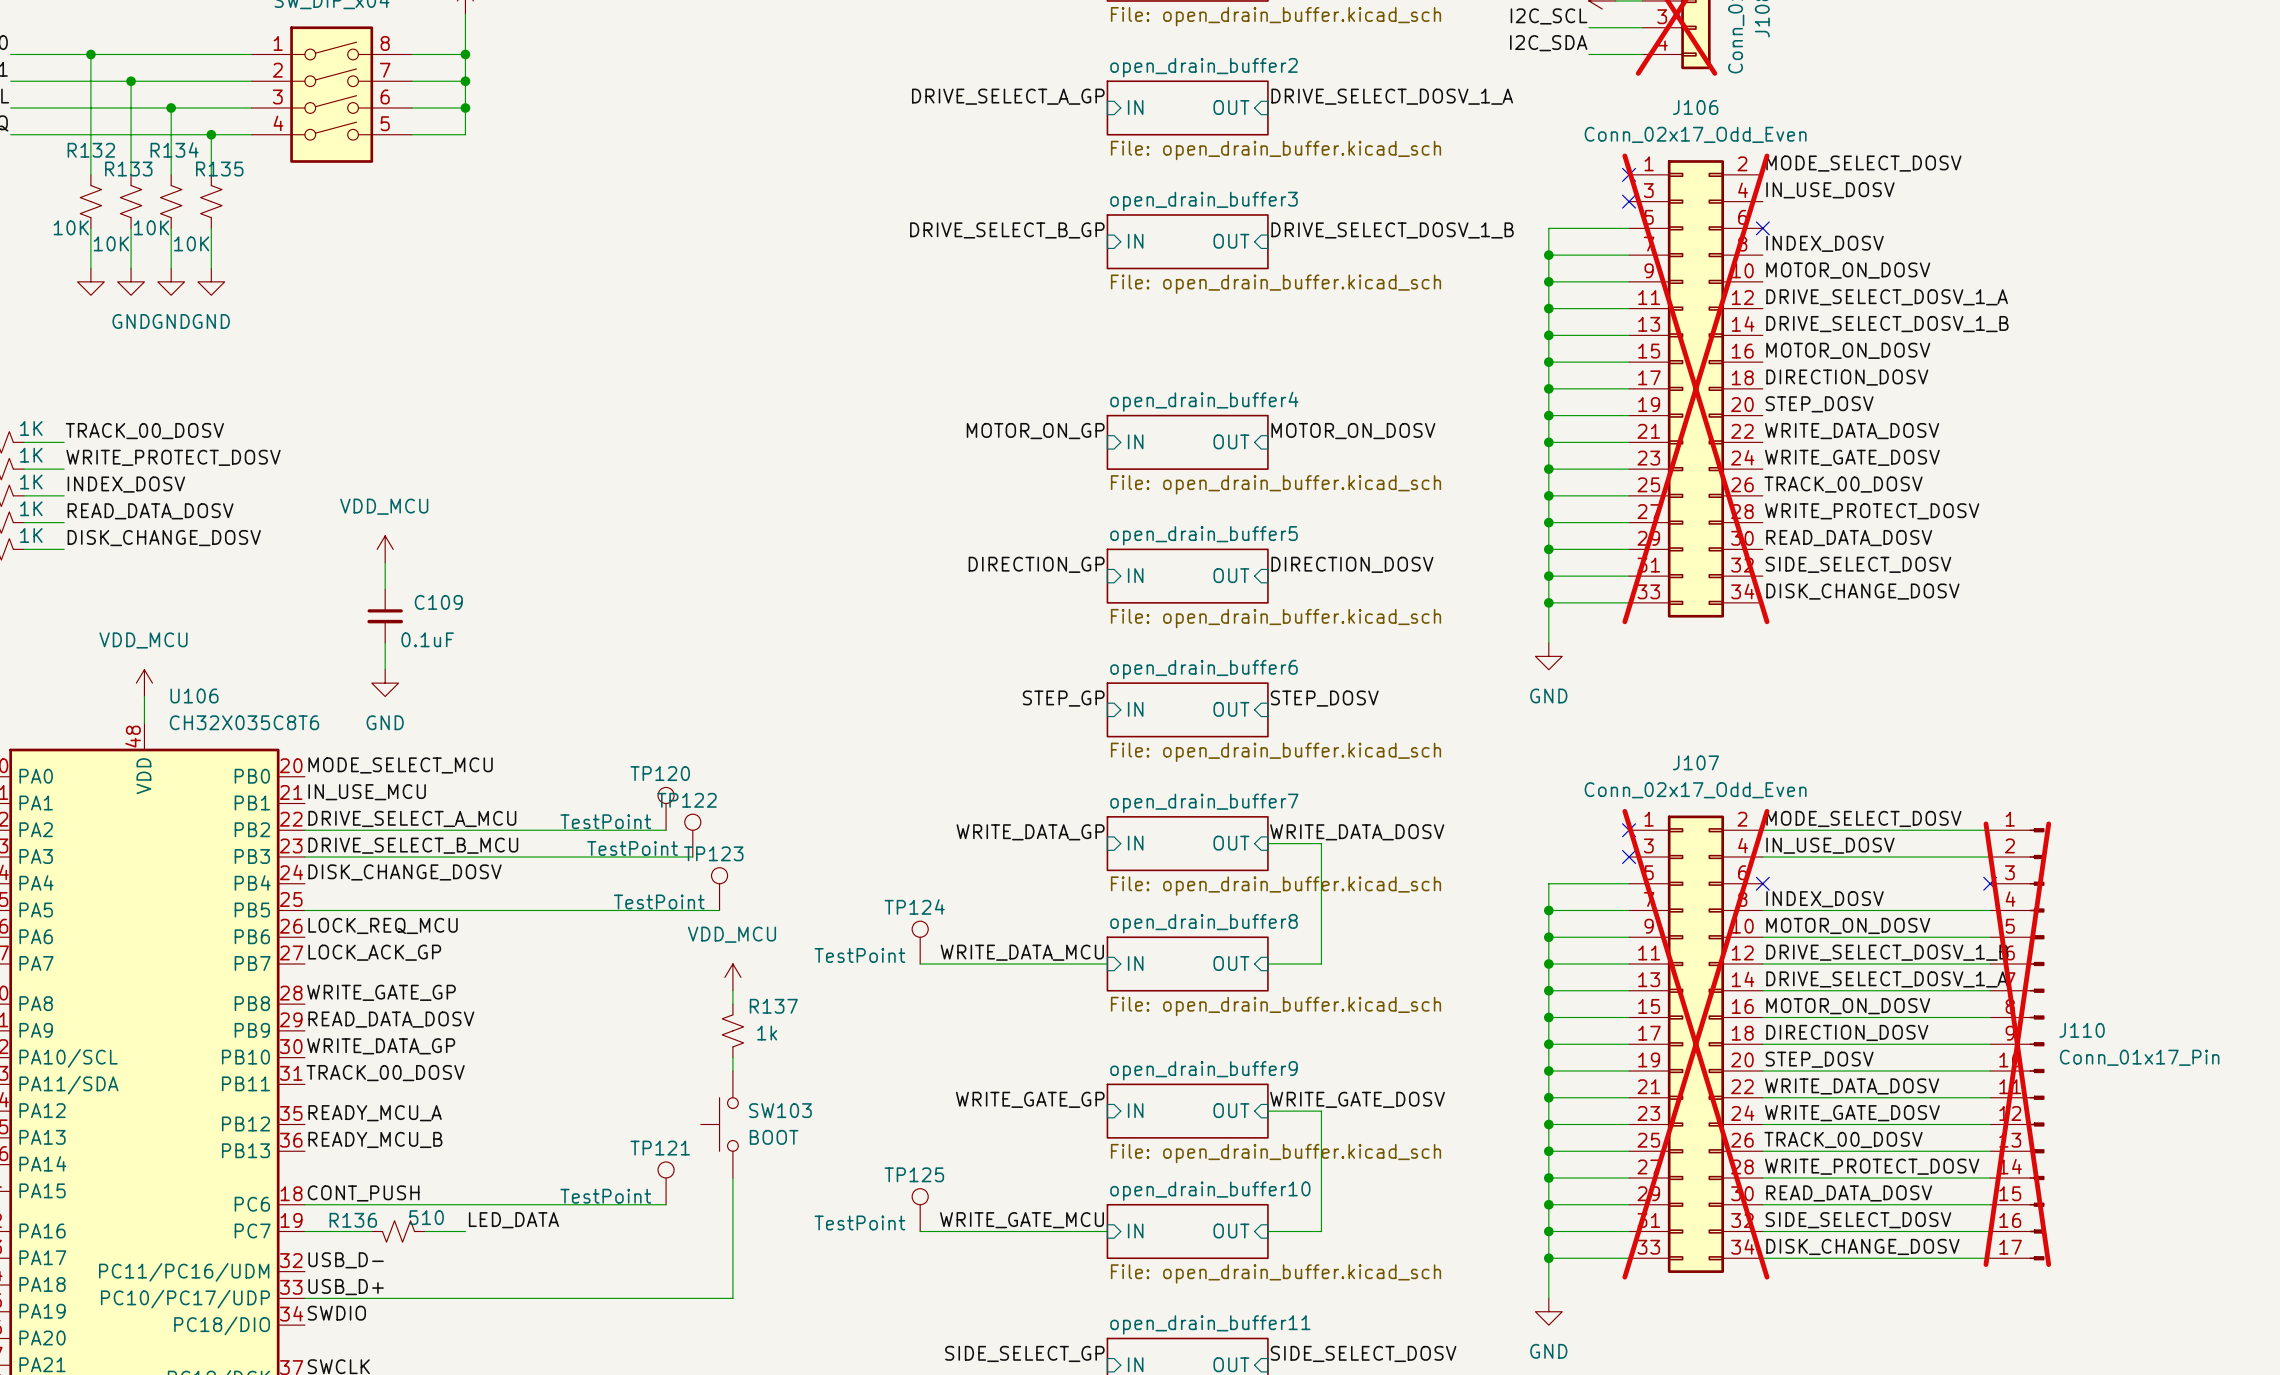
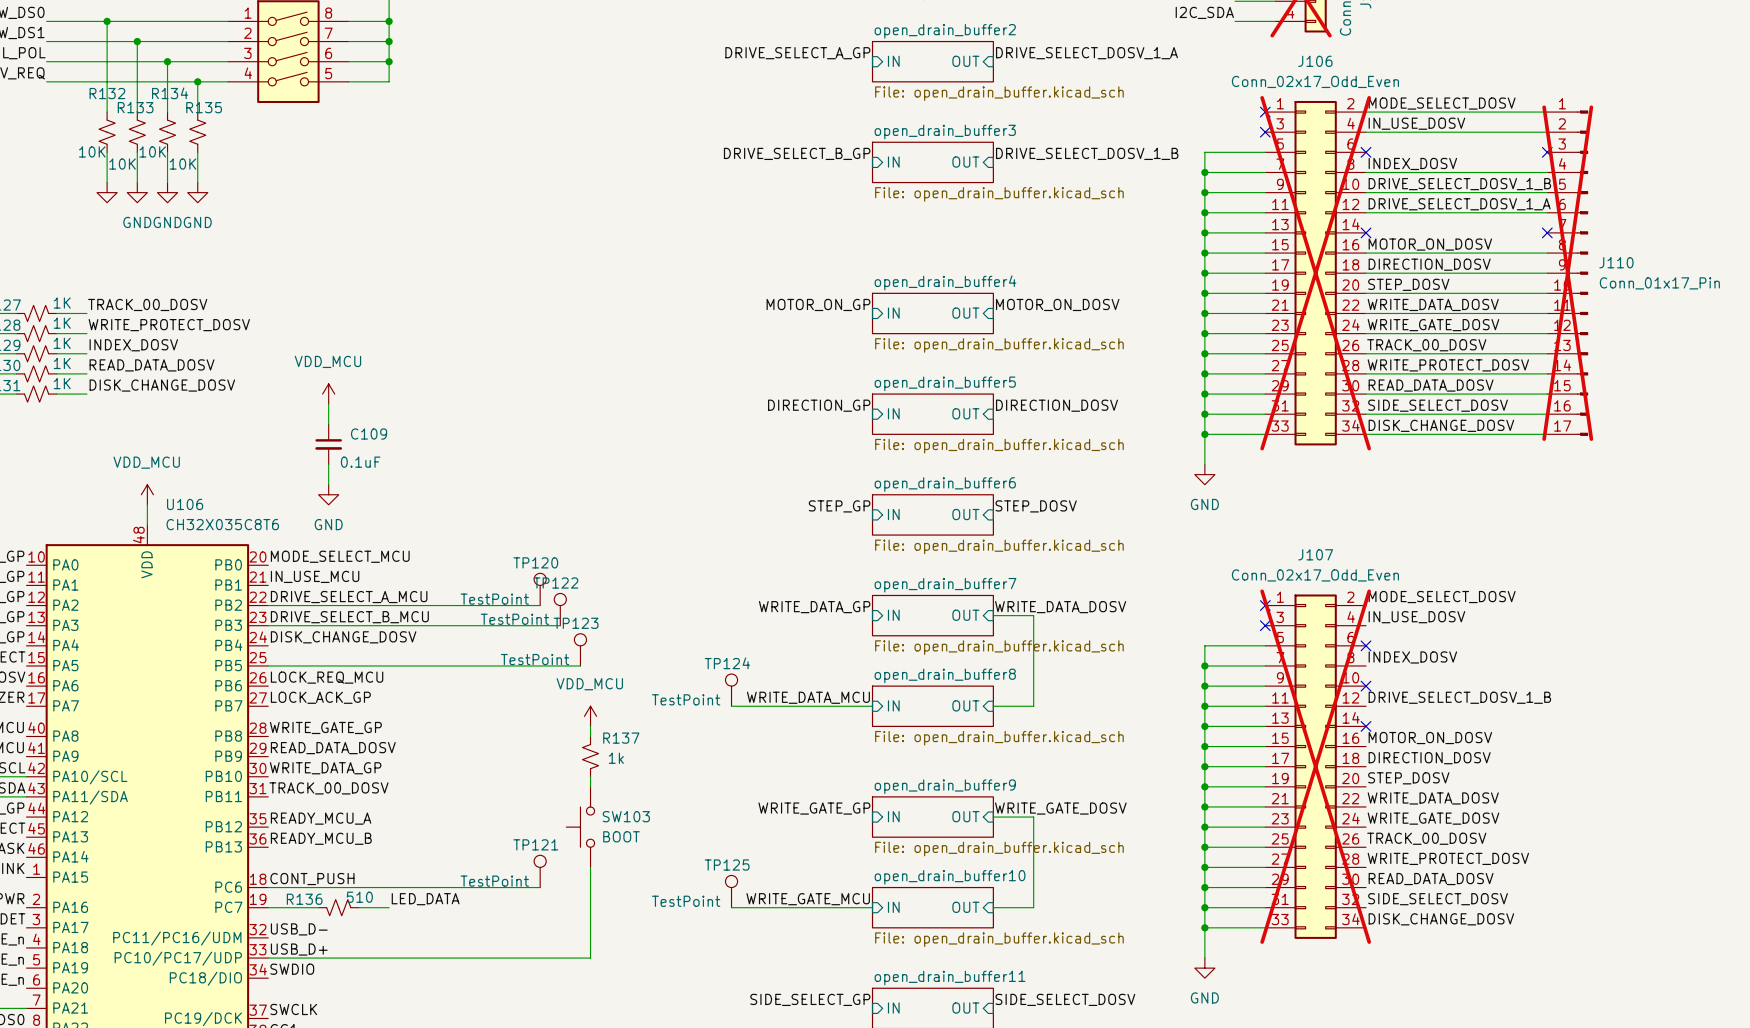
wire: none -> (1366, 112) (1547, 112)
wire: none -> (1366, 132) (1547, 132)
no-connect mark: none -> (1547, 152)
wire: none -> (1366, 172) (1547, 172)
label: MOTOR_ON_DOSV (1848, 270) -> DRIVE_SELECT_DOSV_1_B (1459, 184)
wire: none -> (1366, 192) (1547, 192)
wire: none -> (1366, 212) (1547, 212)
label: DRIVE_SELECT_DOSV_1_B (1887, 324) -> none
no-connect mark: none -> (1366, 232)
no-connect mark: none -> (1547, 232)
wire: none -> (1366, 253) (1547, 253)
wire: none -> (1366, 273) (1547, 273)
wire: none -> (1366, 293) (1547, 293)
wire: none -> (1366, 313) (1547, 313)
wire: none -> (1366, 333) (1547, 333)
wire: none -> (1366, 353) (1547, 353)
wire: none -> (1366, 373) (1547, 373)
wire: none -> (1366, 394) (1547, 394)
wire: none -> (1366, 414) (1547, 414)
wire: none -> (1366, 434) (1547, 434)
wire: (1762, 830) (1990, 830) -> none
wire: (1762, 856) (1990, 856) -> none
no-connect mark: (1990, 883) -> none
wire: (1762, 910) (1990, 910) -> none
label: MOTOR_ON_DOSV (1848, 925) -> none
wire: (1762, 937) (1990, 937) -> none
no-connect mark: none -> (1366, 686)
wire: (1762, 964) (1990, 964) -> none
label: DRIVE_SELECT_DOSV_1_A (1887, 979) -> none
wire: (1762, 990) (1990, 990) -> none
no-connect mark: none -> (1366, 726)
wire: (1762, 1017) (1990, 1017) -> none
wire: (1762, 1044) (1990, 1044) -> none
J110 position: (2017, 1044) -> (1567, 273)
wire: (1762, 1071) (1990, 1071) -> none
wire: (1762, 1097) (1990, 1097) -> none
wire: (1762, 1124) (1990, 1124) -> none
wire: (1762, 1151) (1990, 1151) -> none
wire: (1762, 1178) (1990, 1178) -> none
wire: (1762, 1204) (1990, 1204) -> none
wire: (1762, 1231) (1990, 1231) -> none
wire: (1762, 1258) (1990, 1258) -> none

